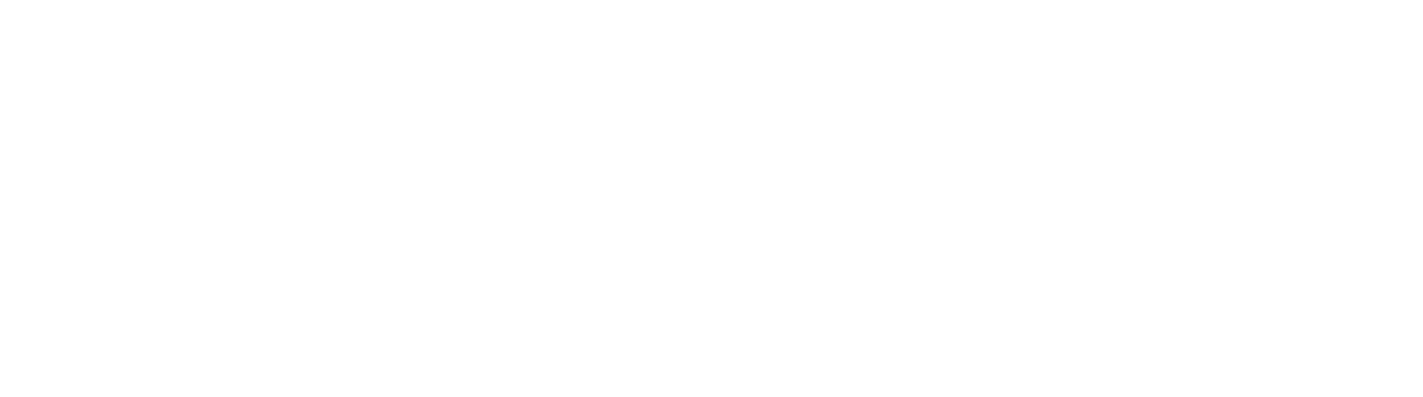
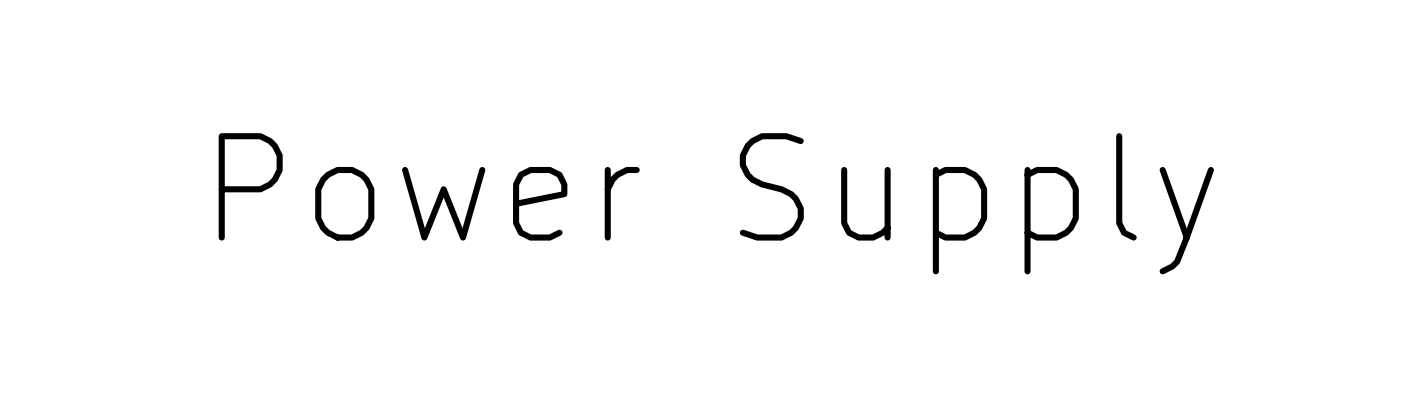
text: none -> Power Supply (716, 203)

